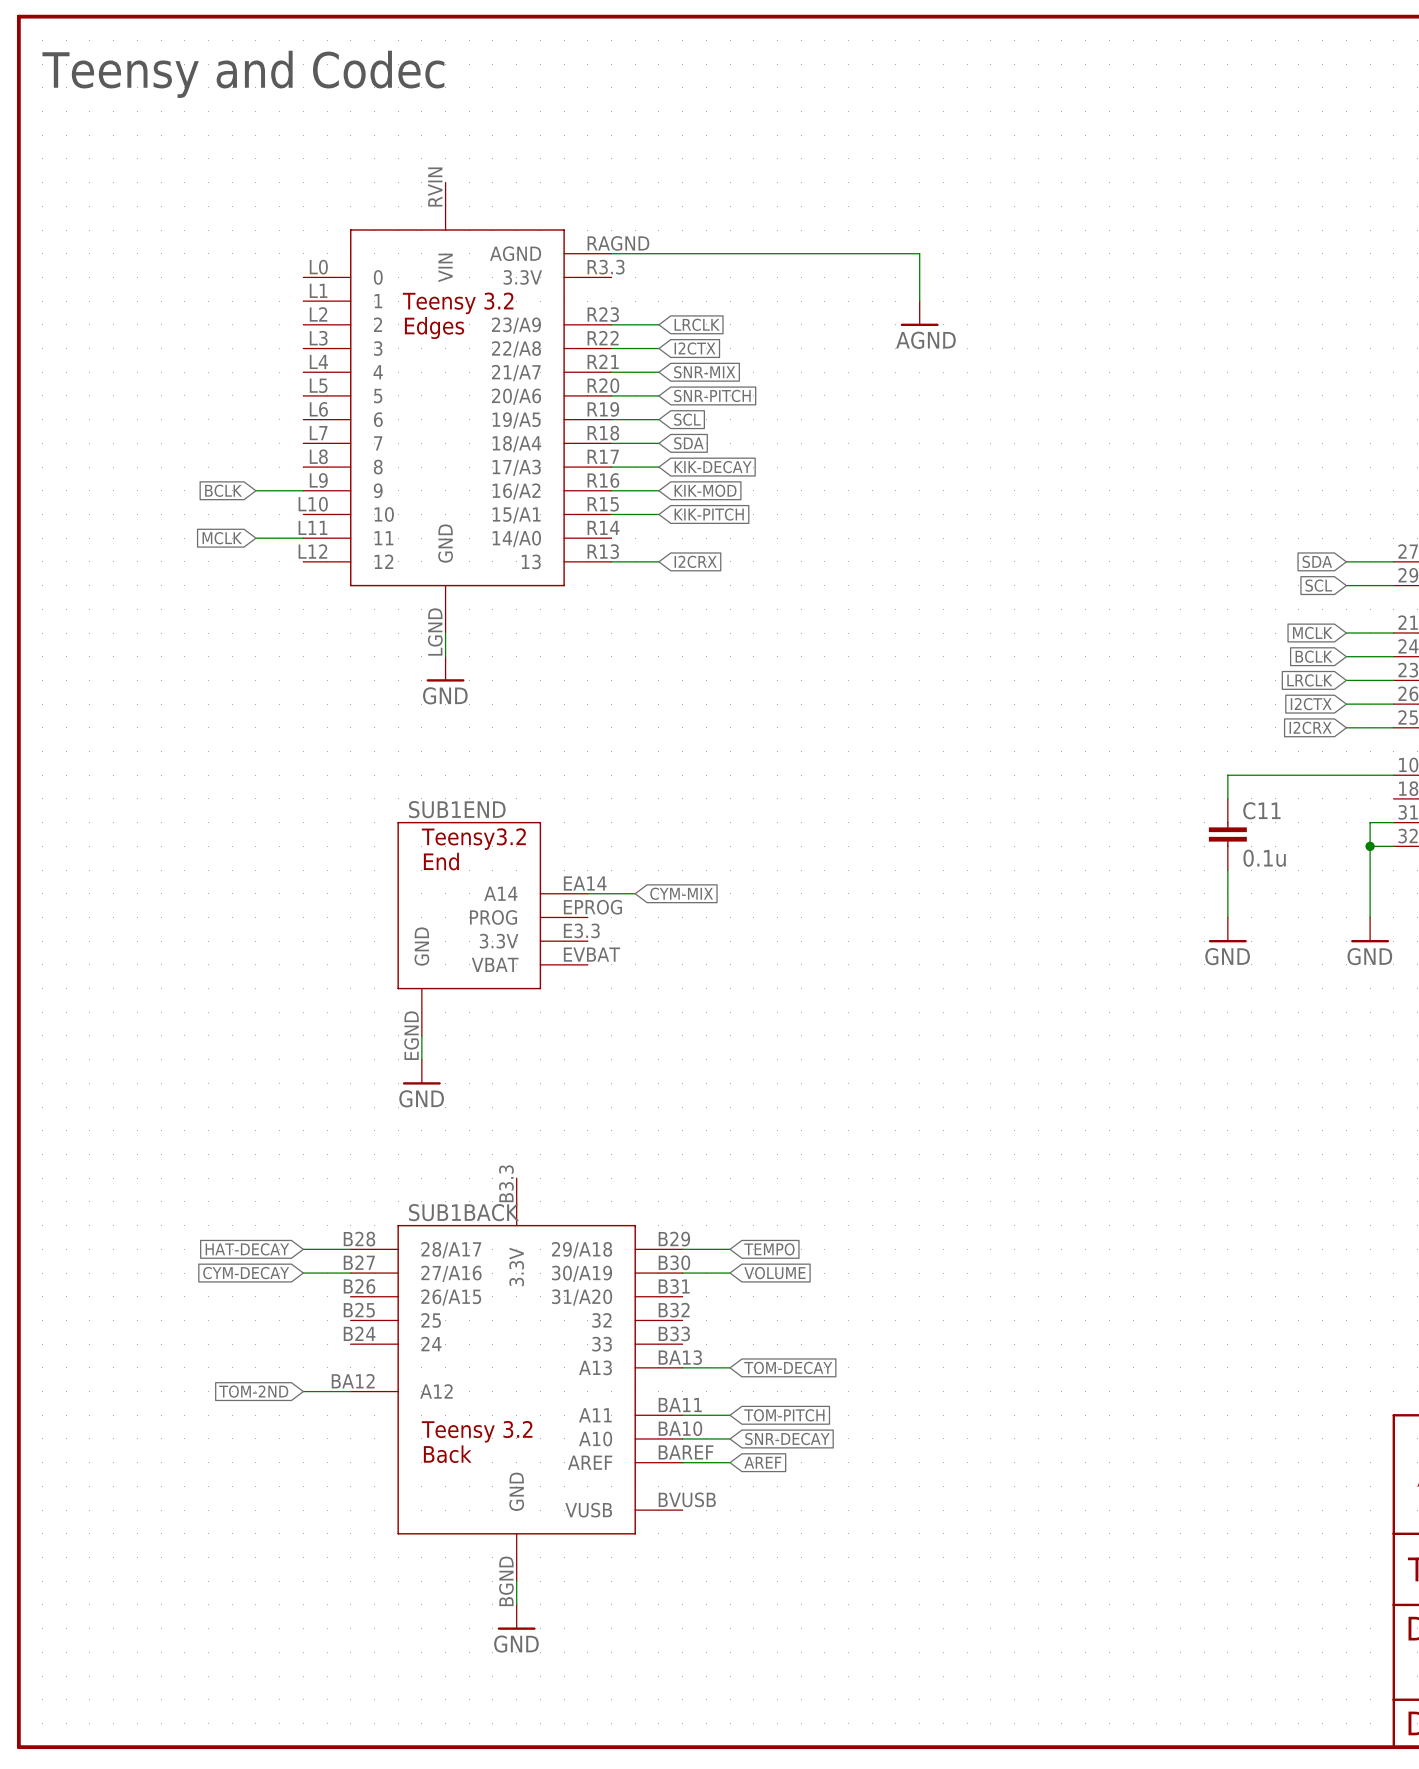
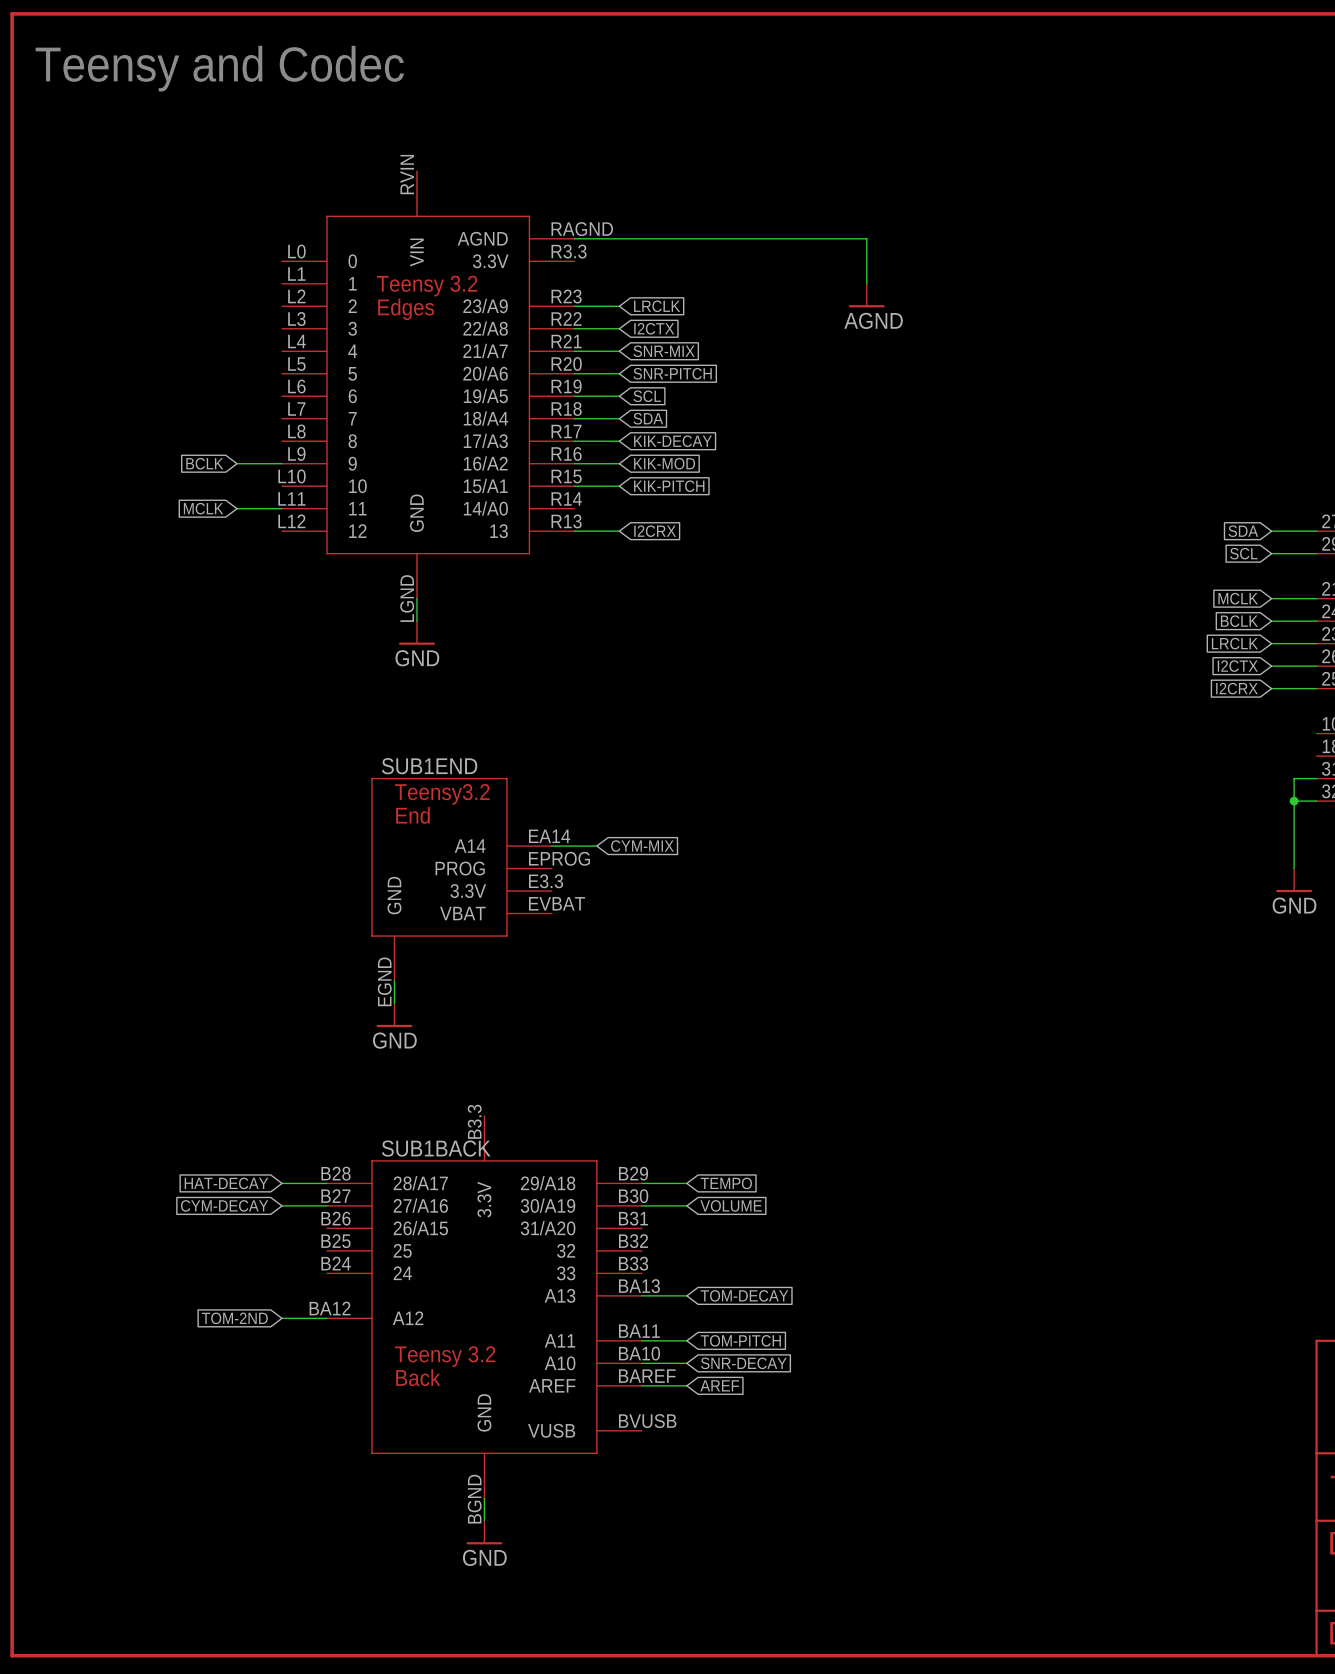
wire: (1393, 775) (1227, 775) (1227, 798) -> none
C11: 0.1u (1227, 834) -> none
wire: (1227, 870) (1227, 917) -> none
power symbol: GND (1227, 929) -> none

